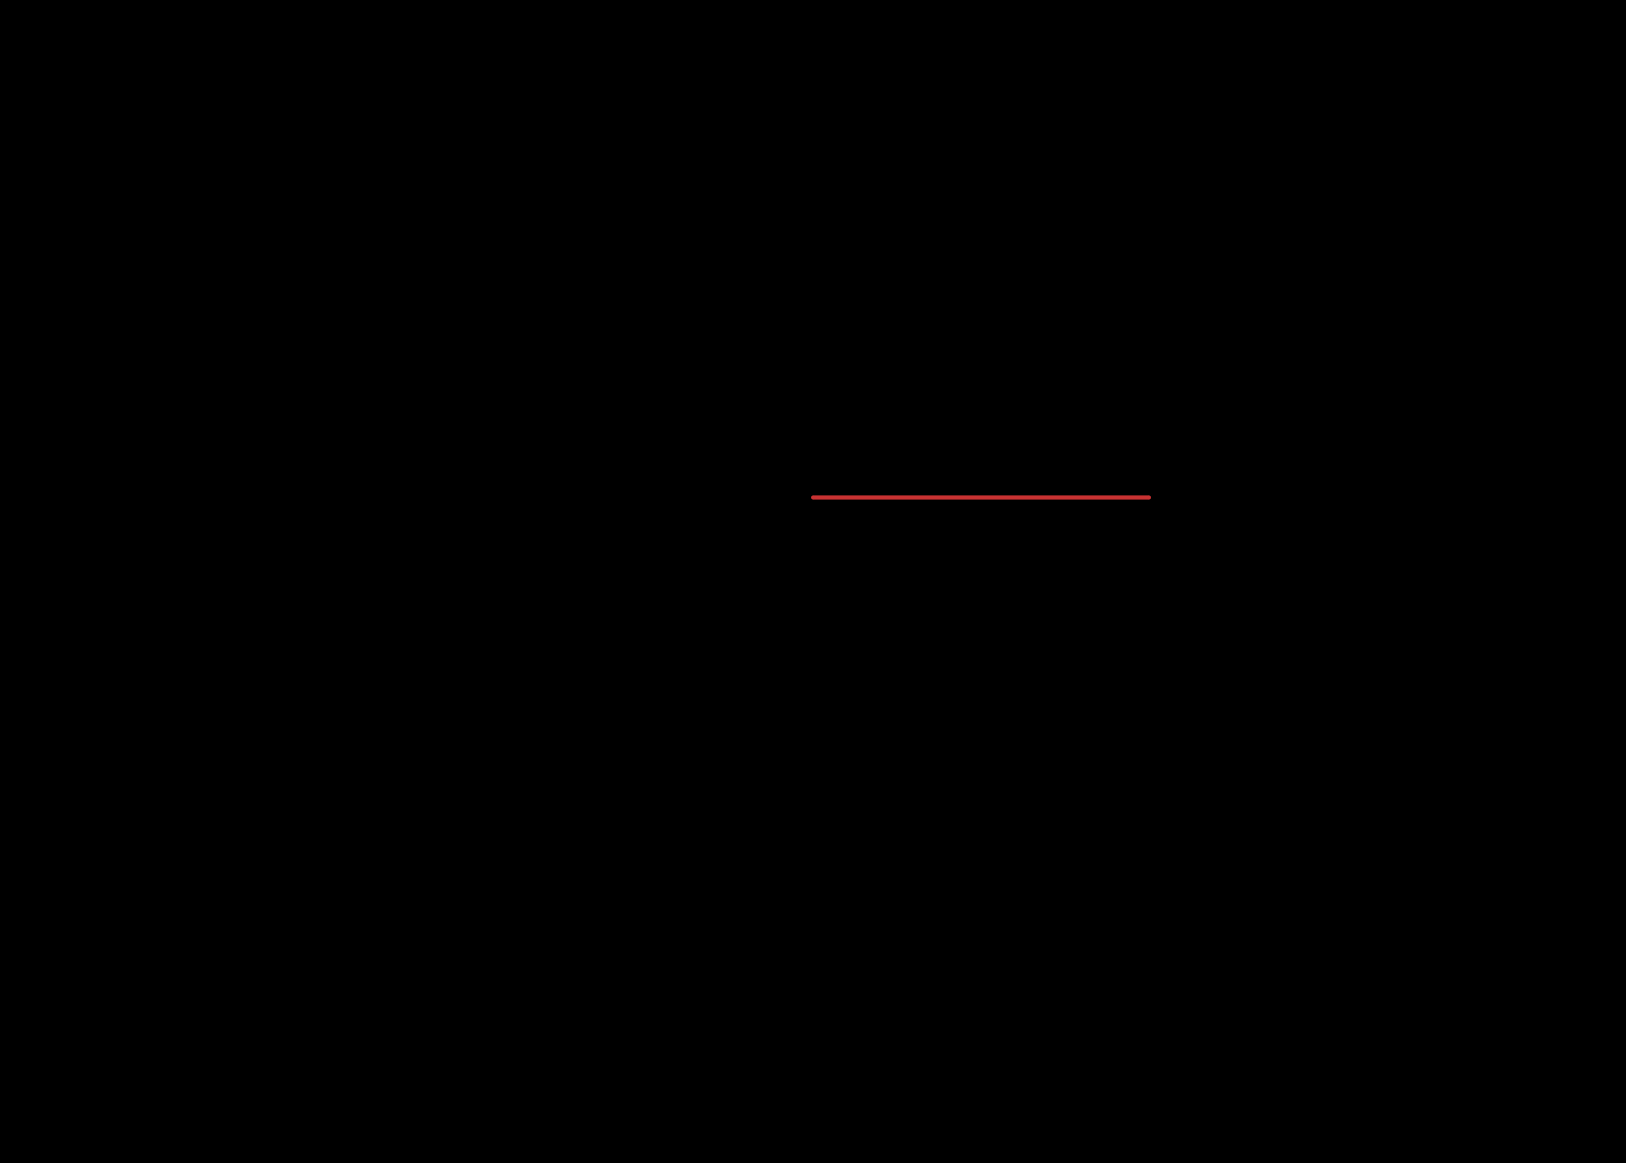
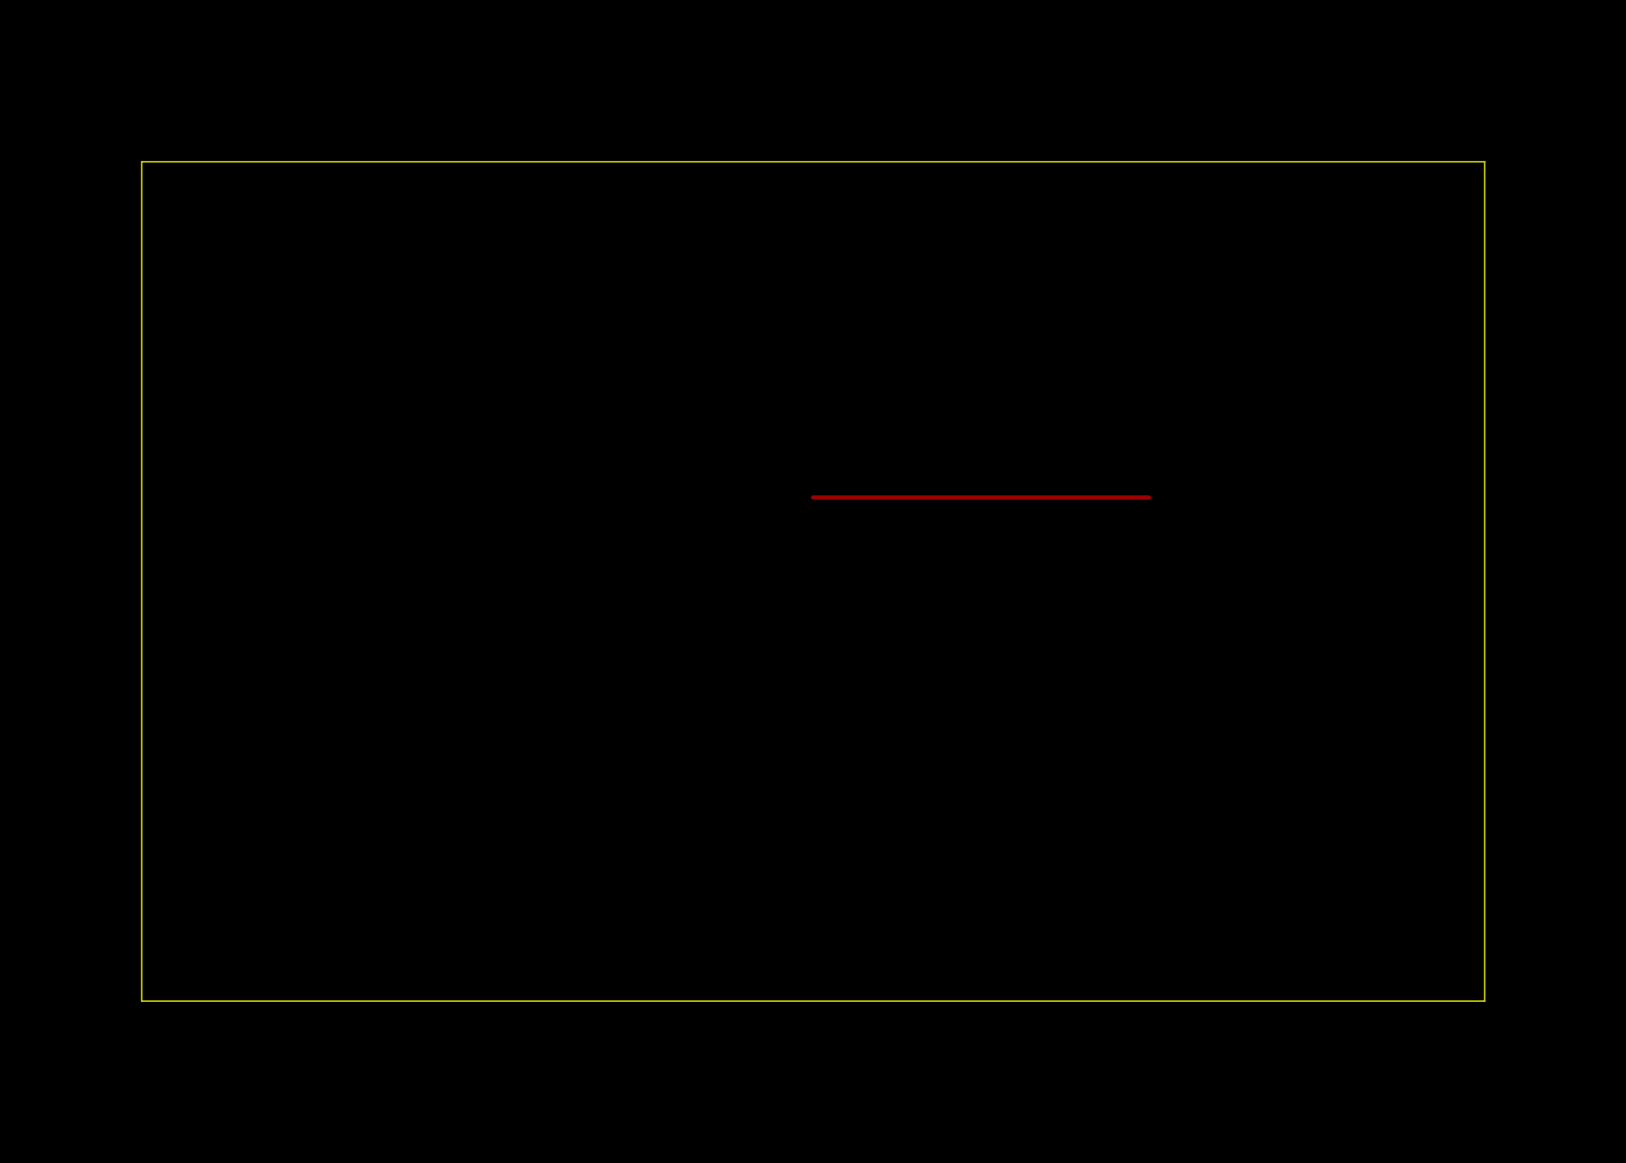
board edge: none -> (1484, 161) (141, 161) (141, 1001) (1484, 1001) (1484, 161)

